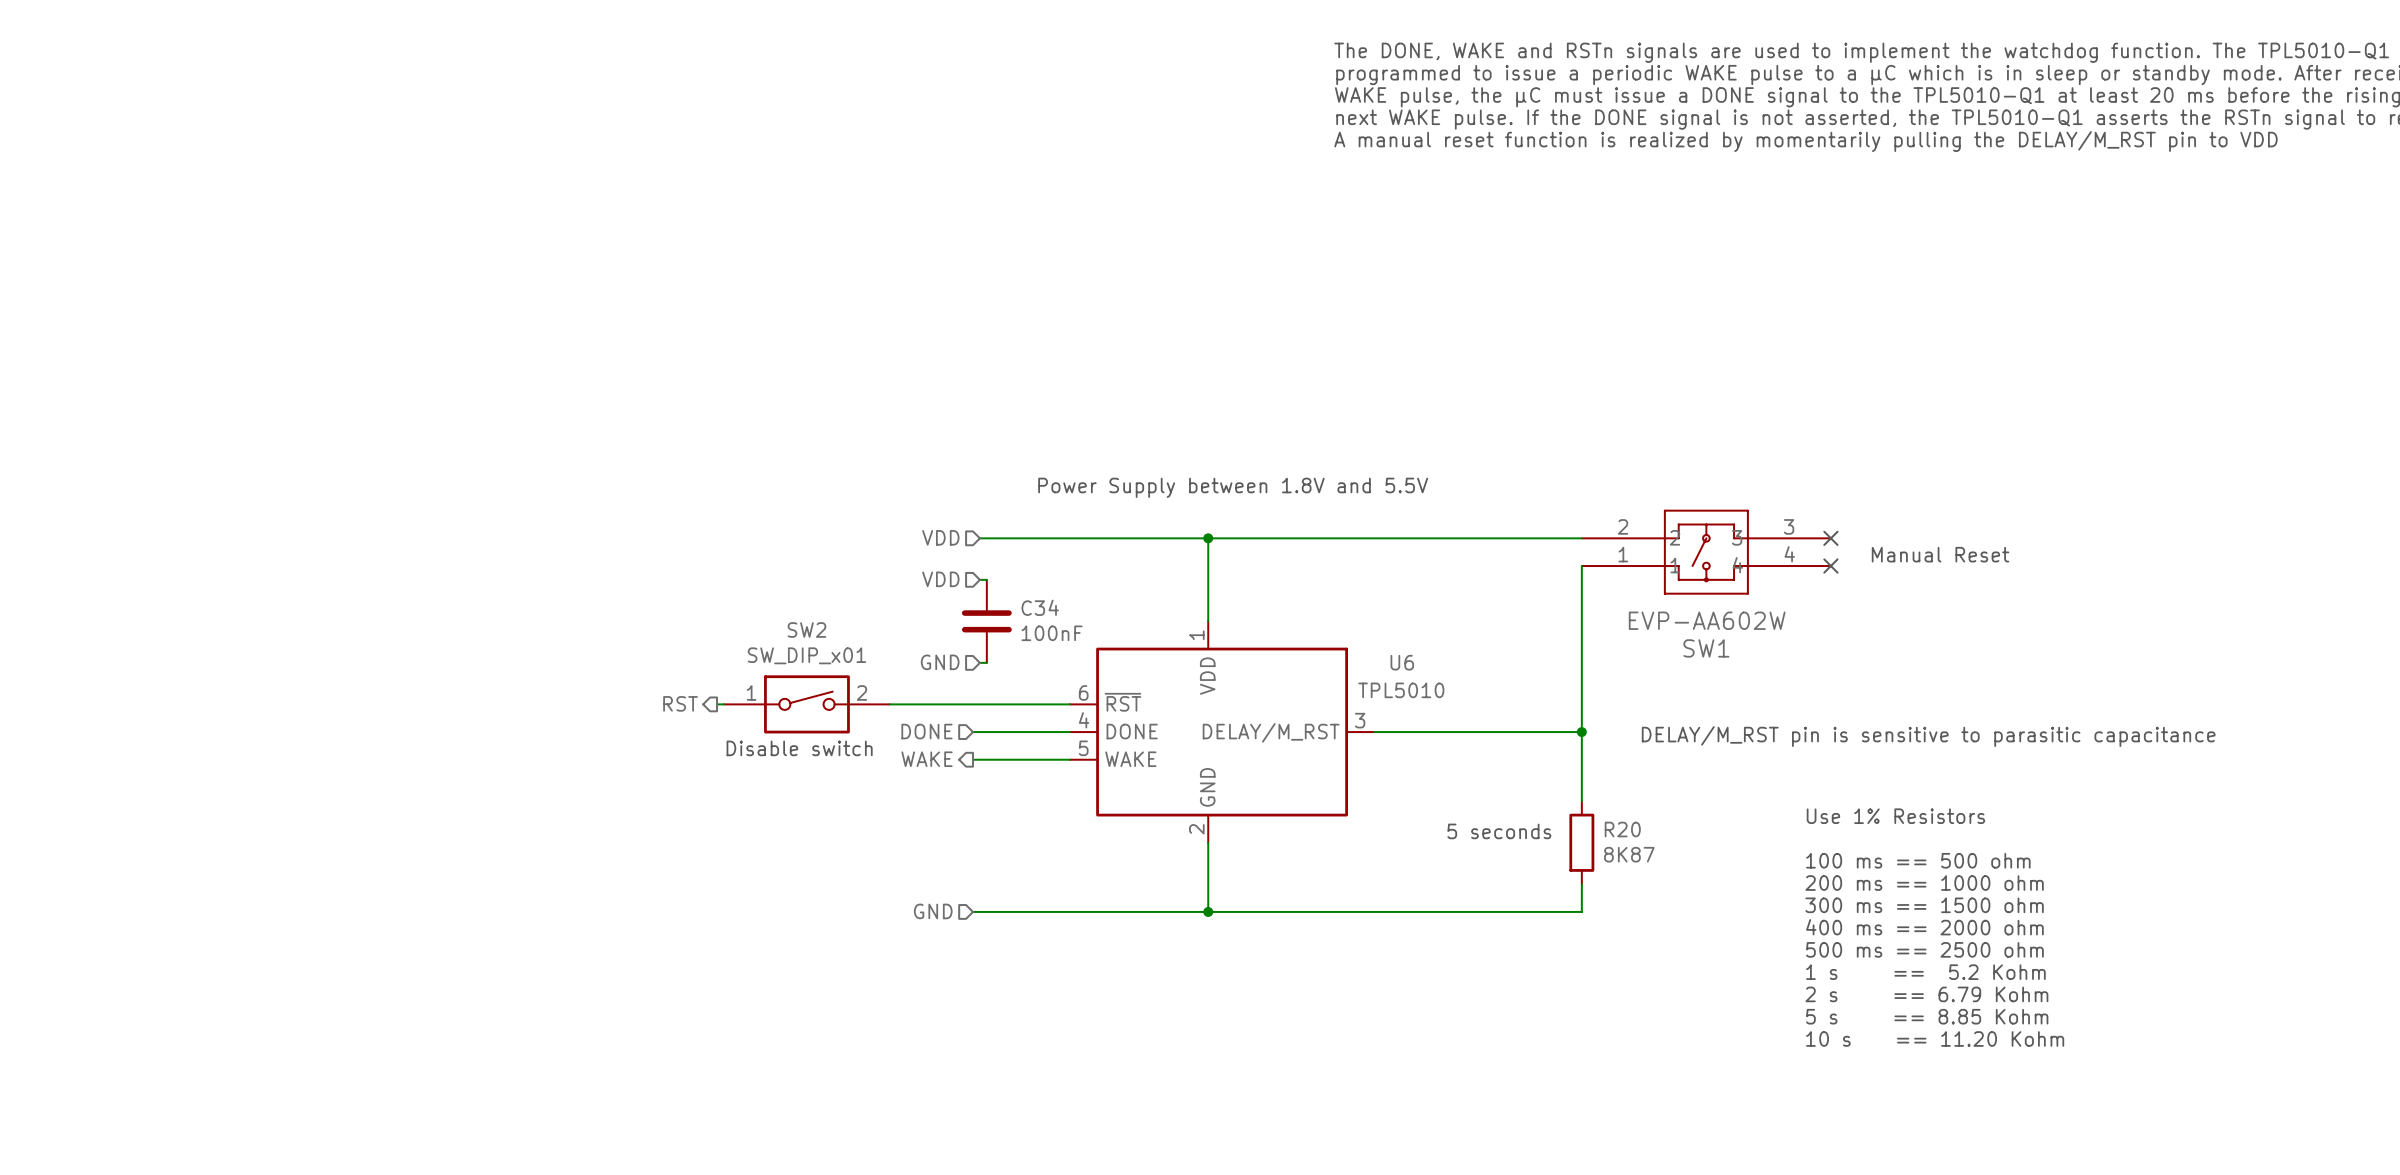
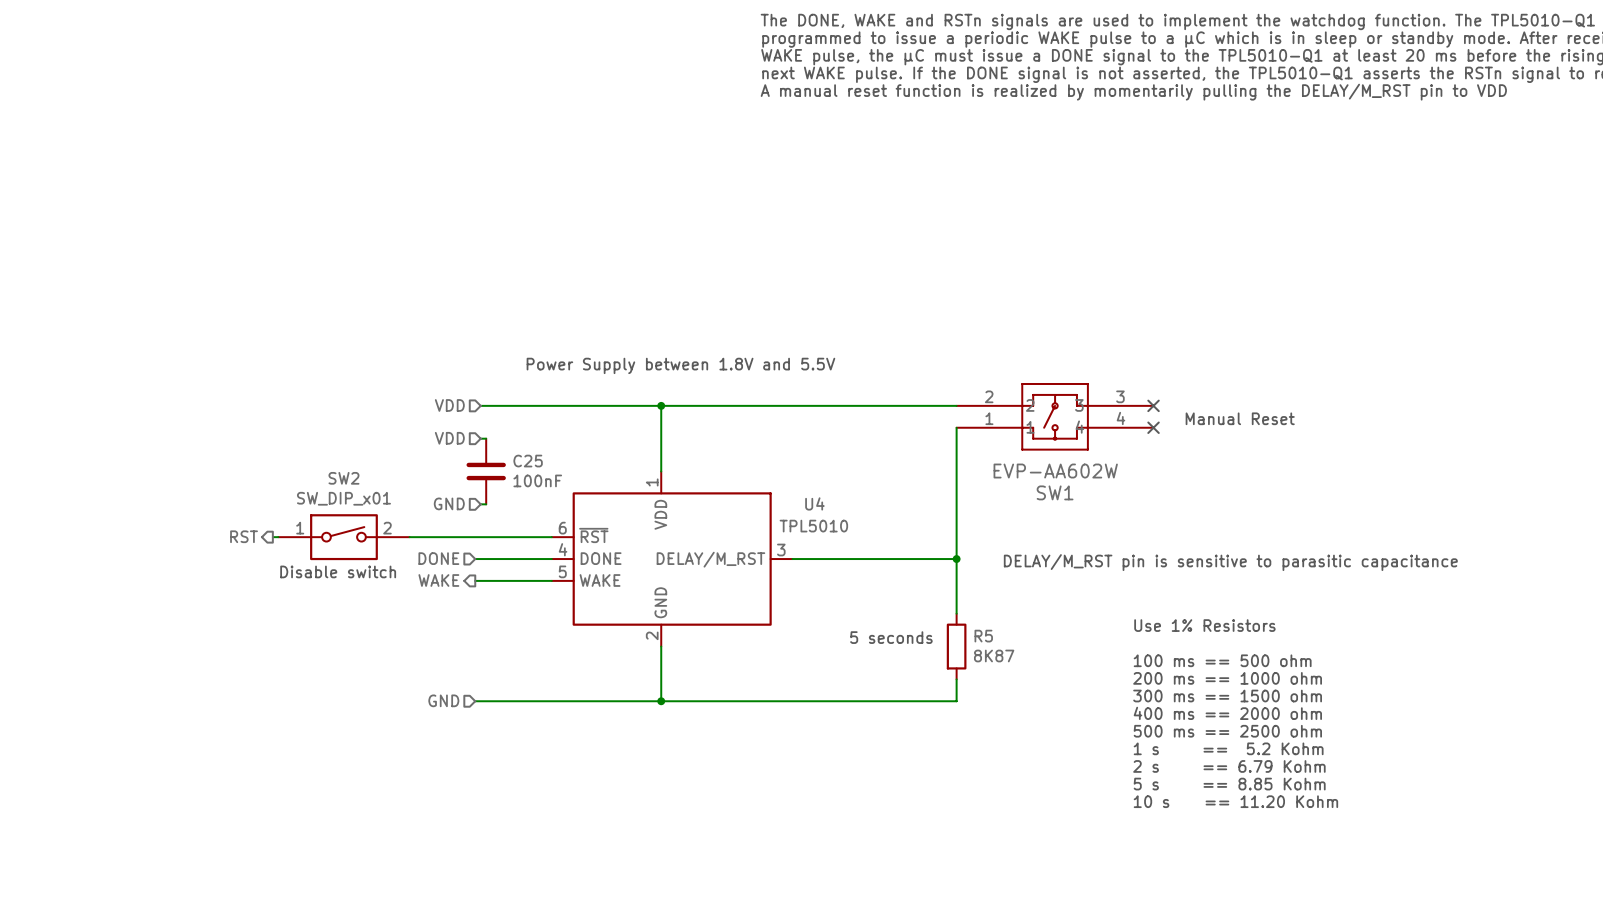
C34 name: C34 (1040, 607) -> C25 (528, 461)
U6 name: U6 (1402, 662) -> U4 (814, 503)
R20 name: R20 (1622, 829) -> R5 (983, 636)

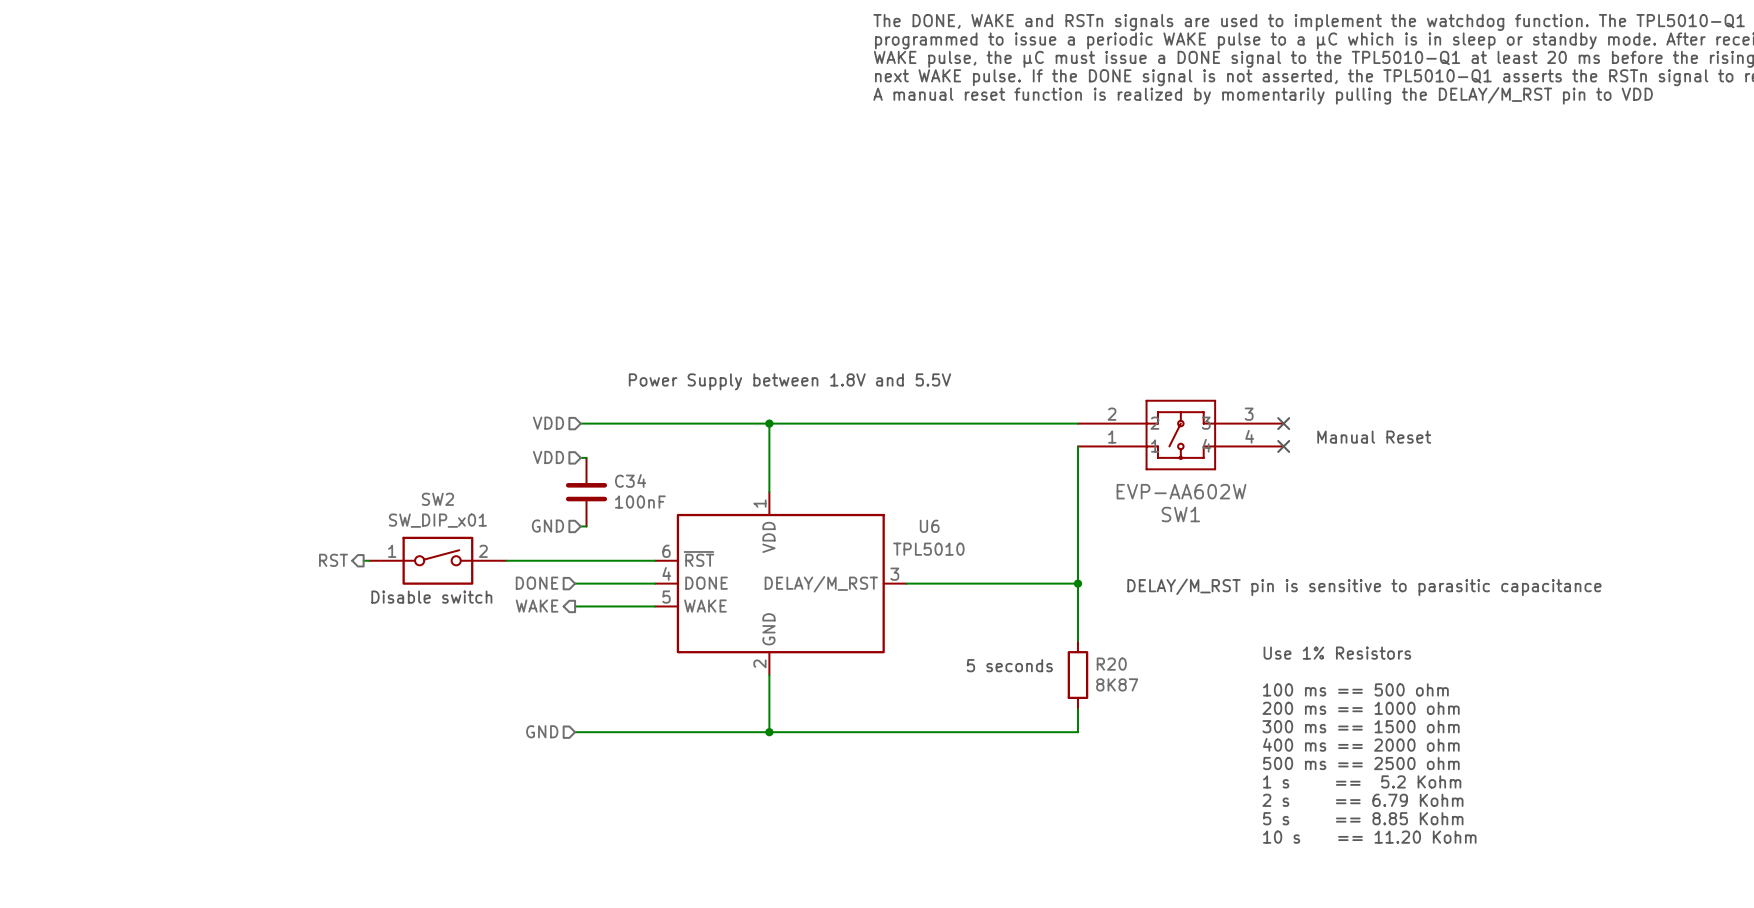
C25 name: C25 (528, 461) -> C34 (630, 480)
U4 name: U4 (814, 503) -> U6 (929, 526)
R5 name: R5 (983, 636) -> R20 (1111, 664)

